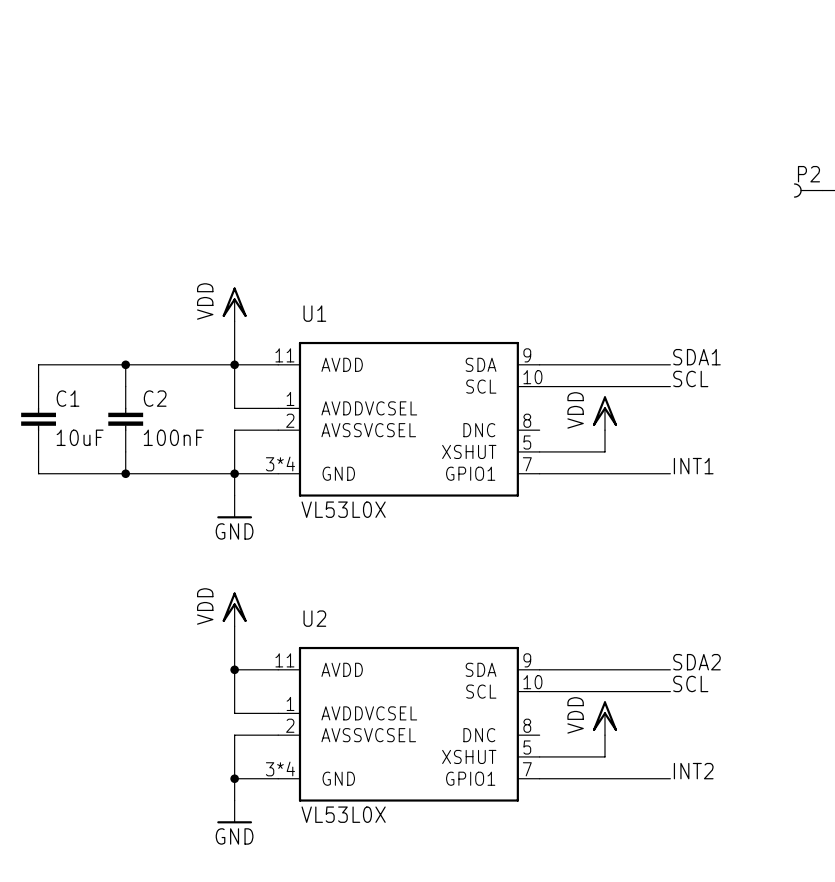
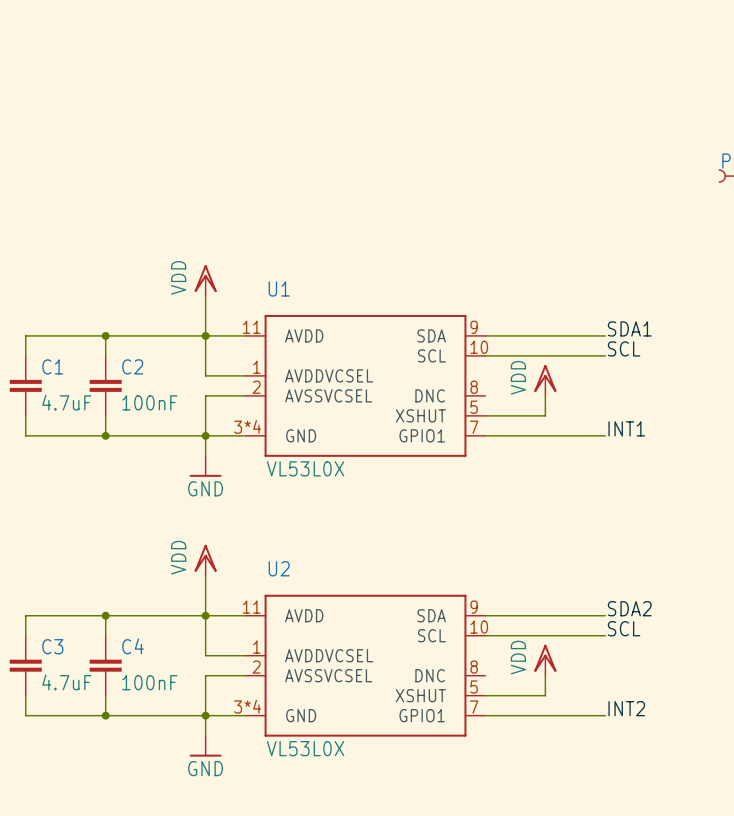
C1 value: 10uF (80, 437) -> 4.7uF (66, 402)
wire: none -> (105, 615) (105, 635)
junction: none -> (105, 615)
wire: none -> (205, 615) (25, 615) (25, 635)
C3: none -> 4.7uF (25, 665)
C4: none -> 100nF (105, 665)
wire: none -> (25, 695) (25, 715) (205, 715)
wire: none -> (105, 695) (105, 715)
junction: none -> (105, 715)

